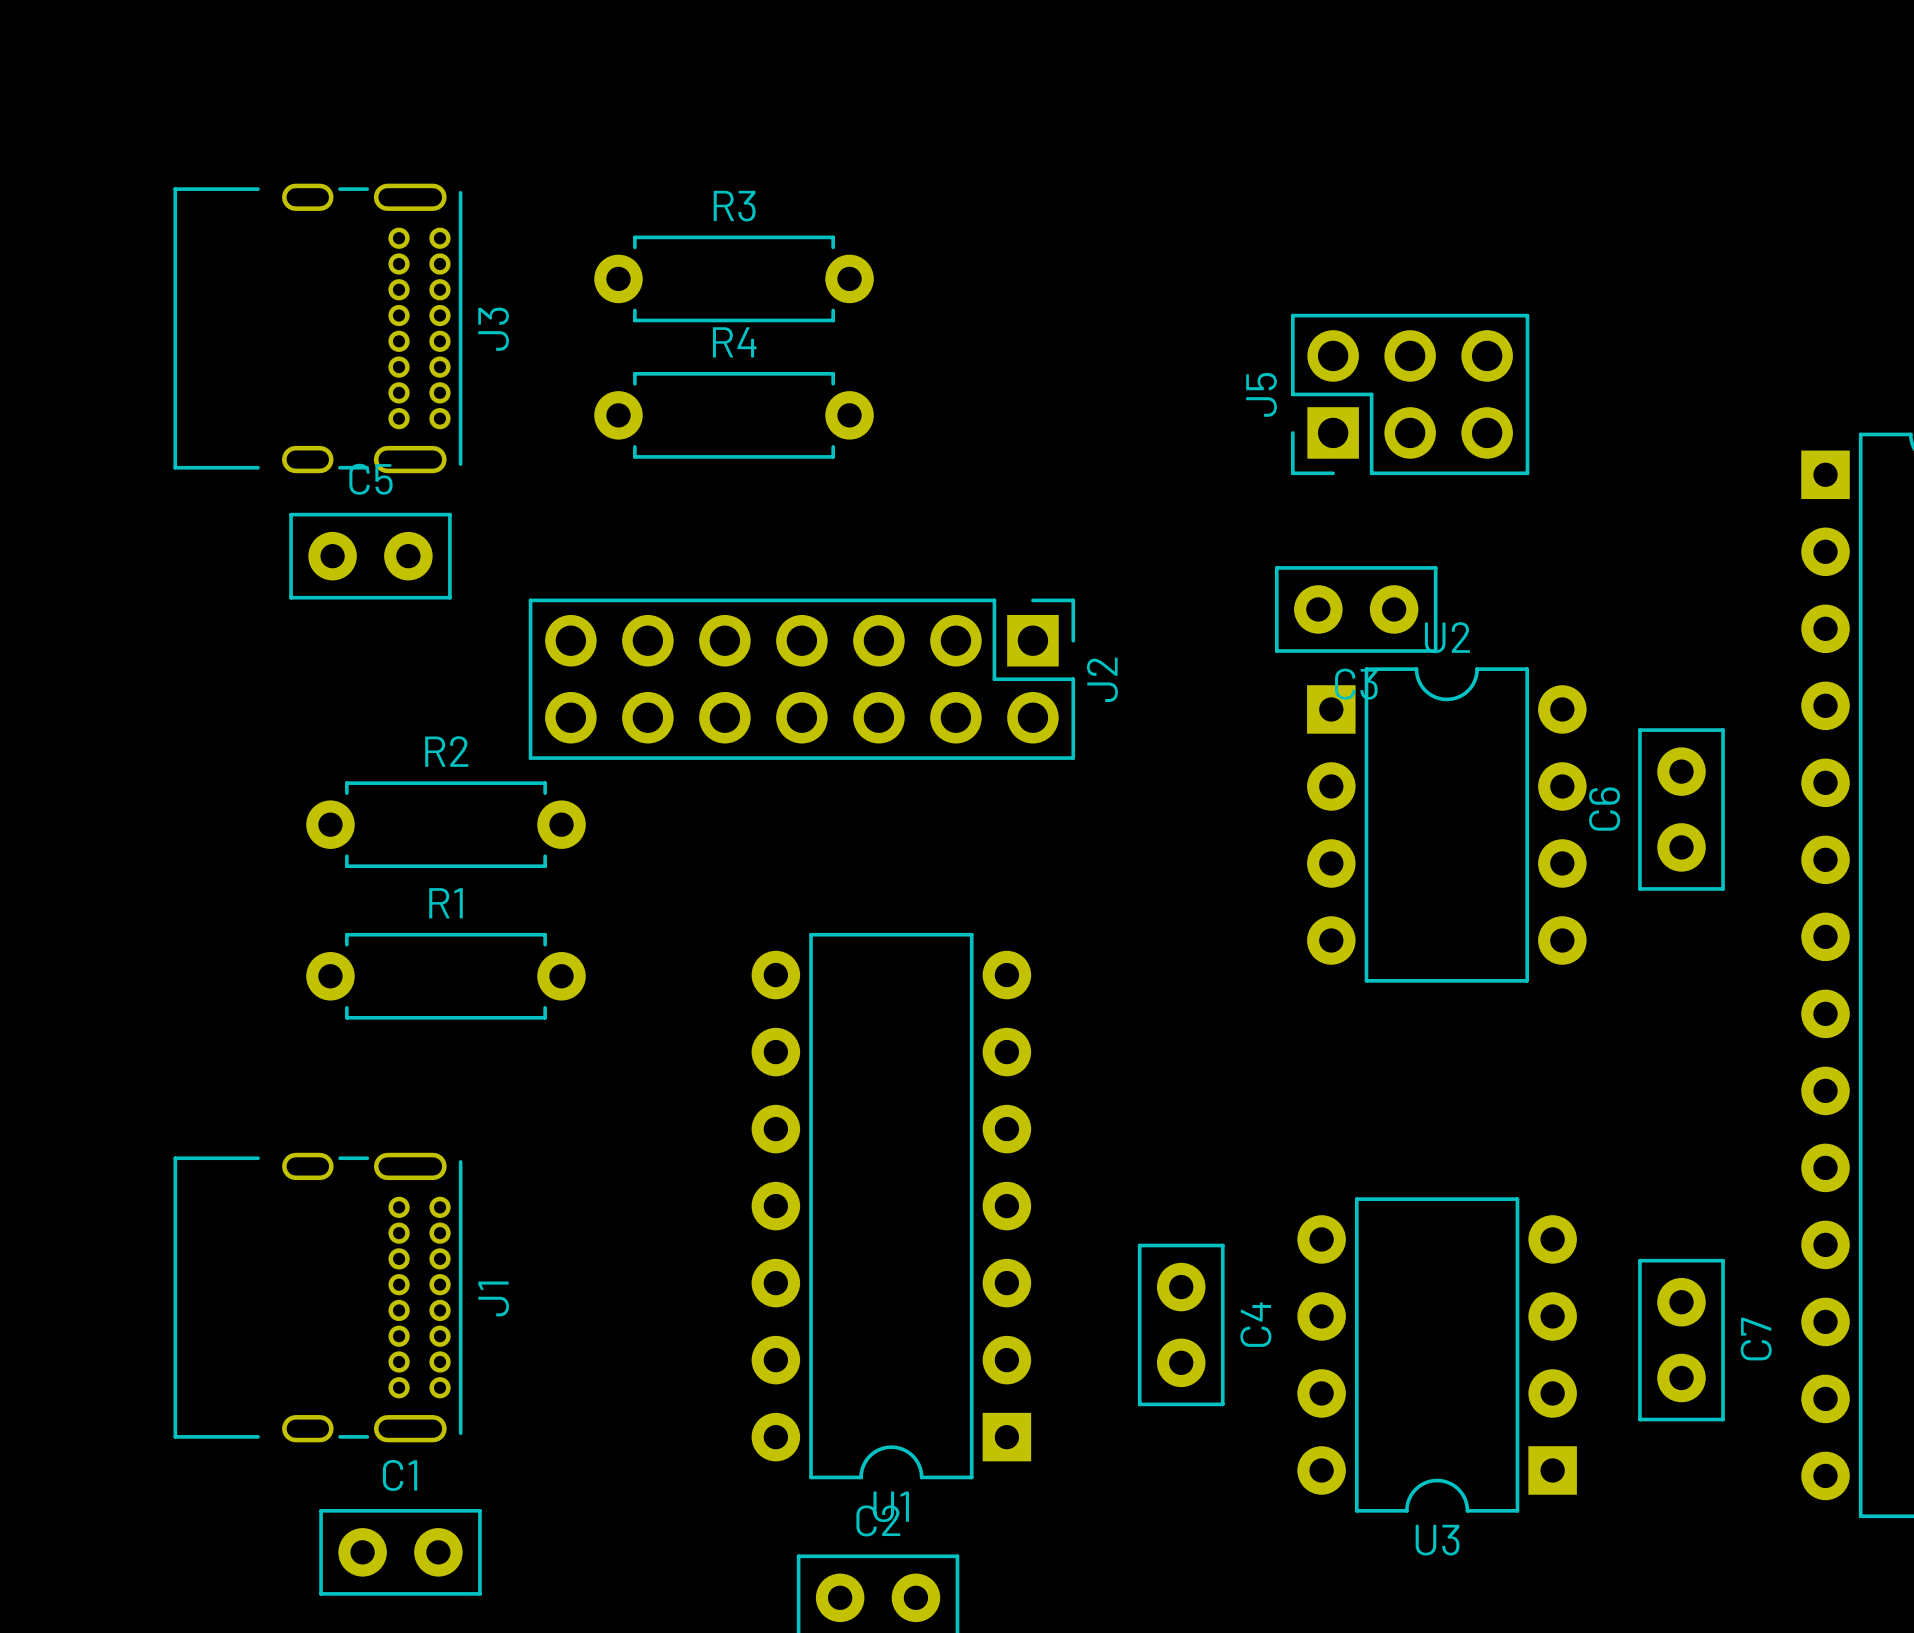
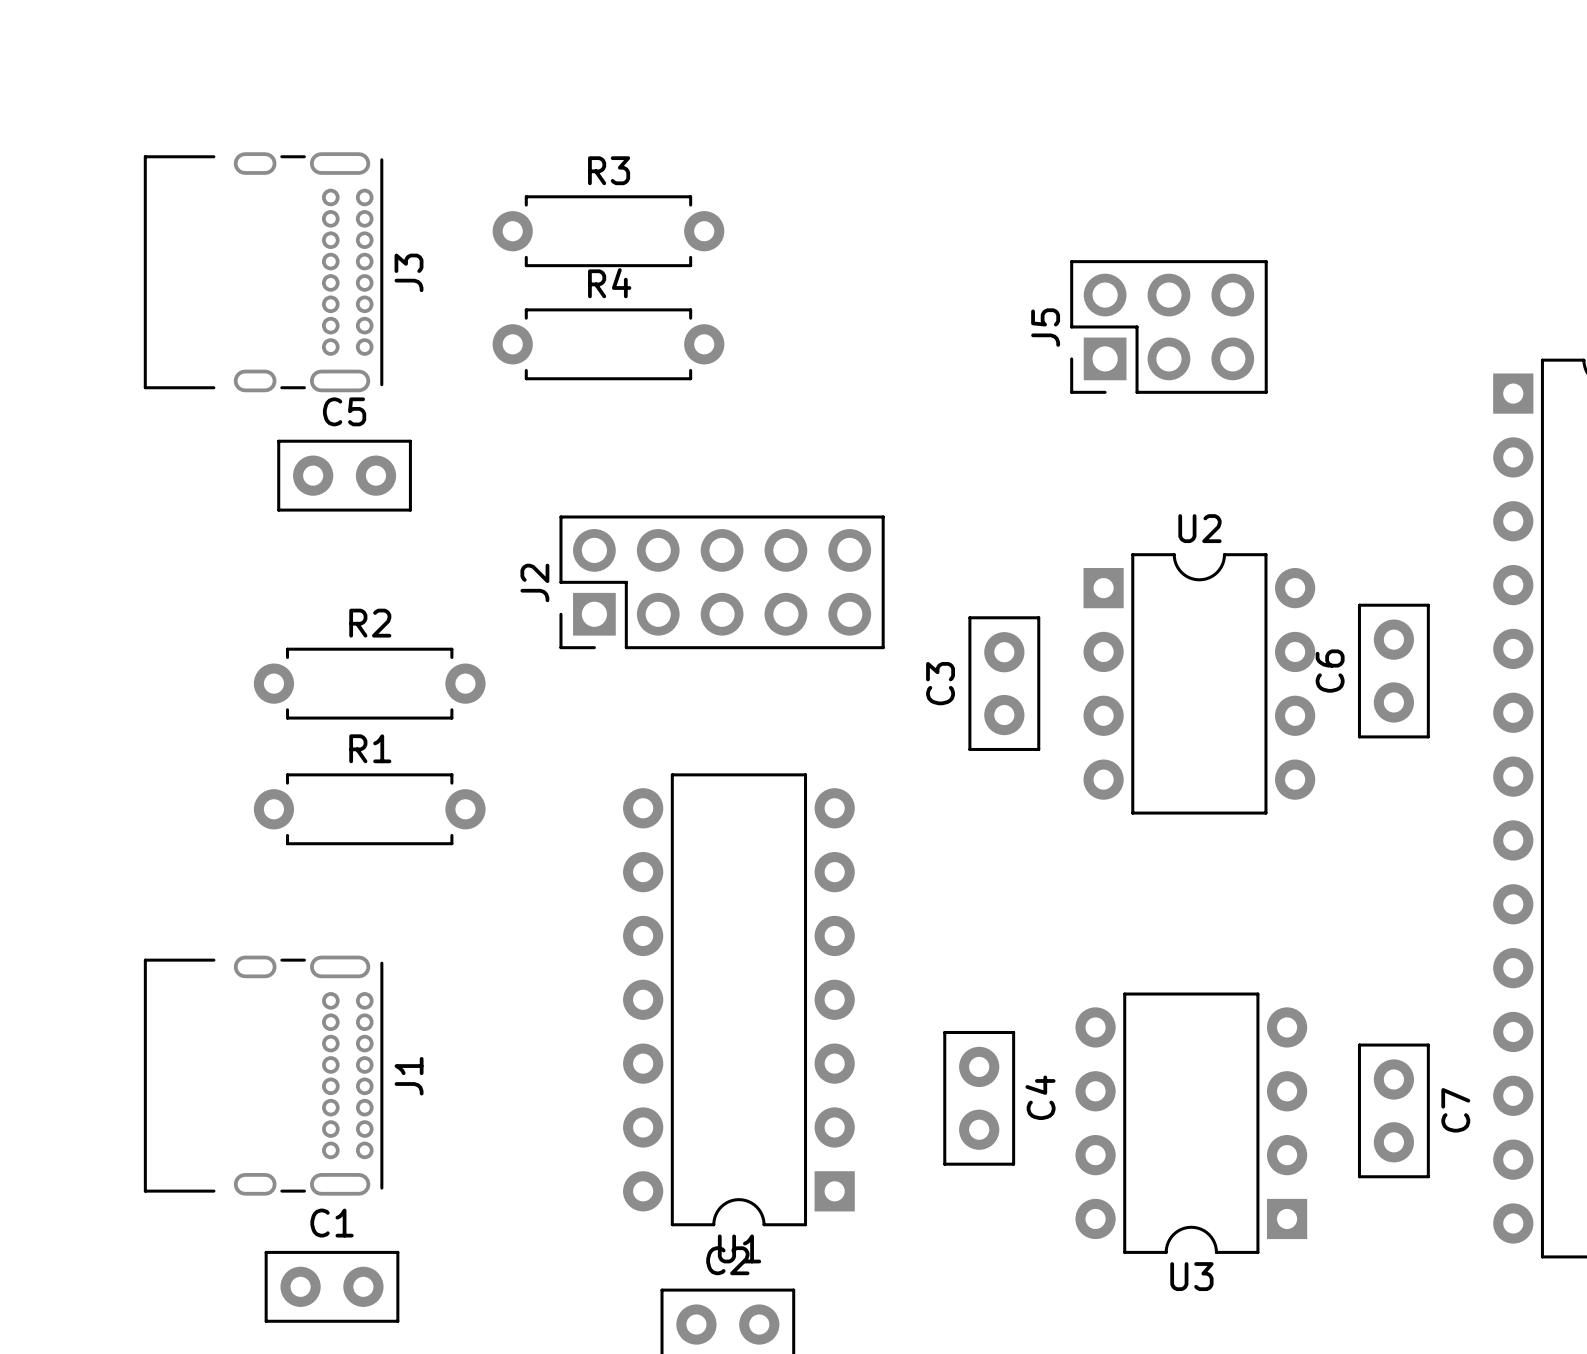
C5 position: (370, 556) -> (344, 475)
J2 footprint: [528, 598, 1076, 760] -> [559, 515, 885, 650]
C3 rotation: 0° (1356, 609) -> 90° clockwise (1004, 683)
C3 position: (1356, 609) -> (1004, 683)
J2 name position: J2 (1102, 679) -> J2 (534, 582)

